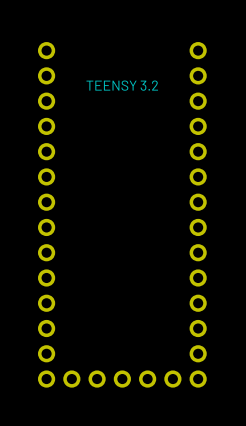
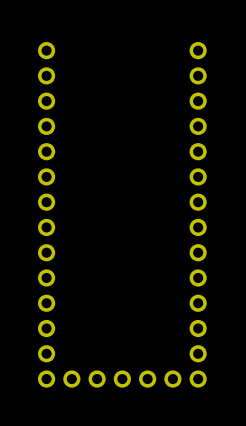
part text: TEENSY 3.2 (122, 85) -> none

